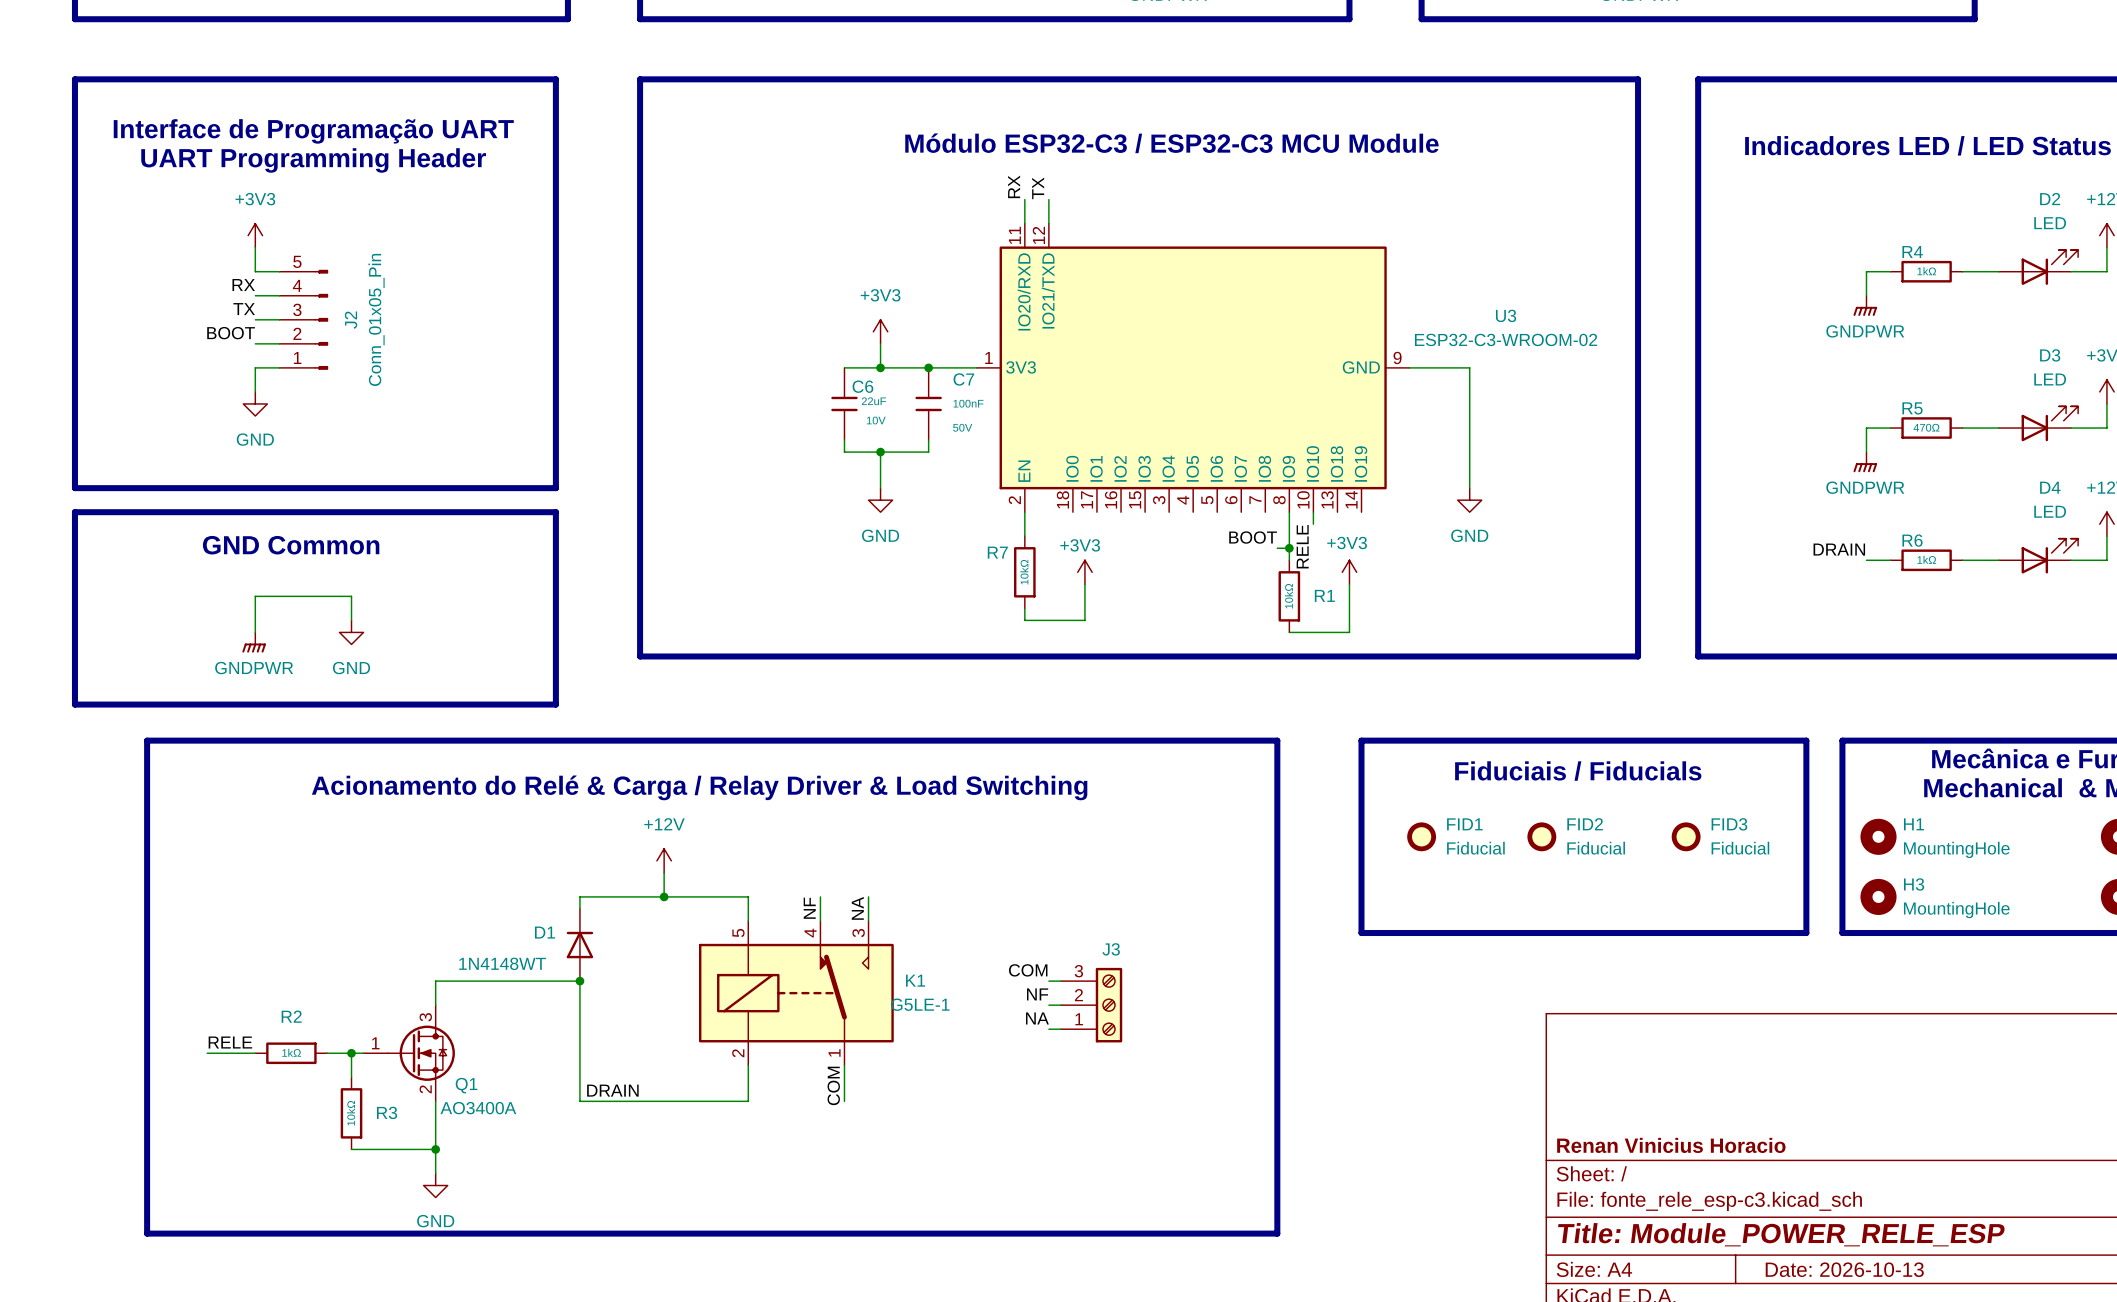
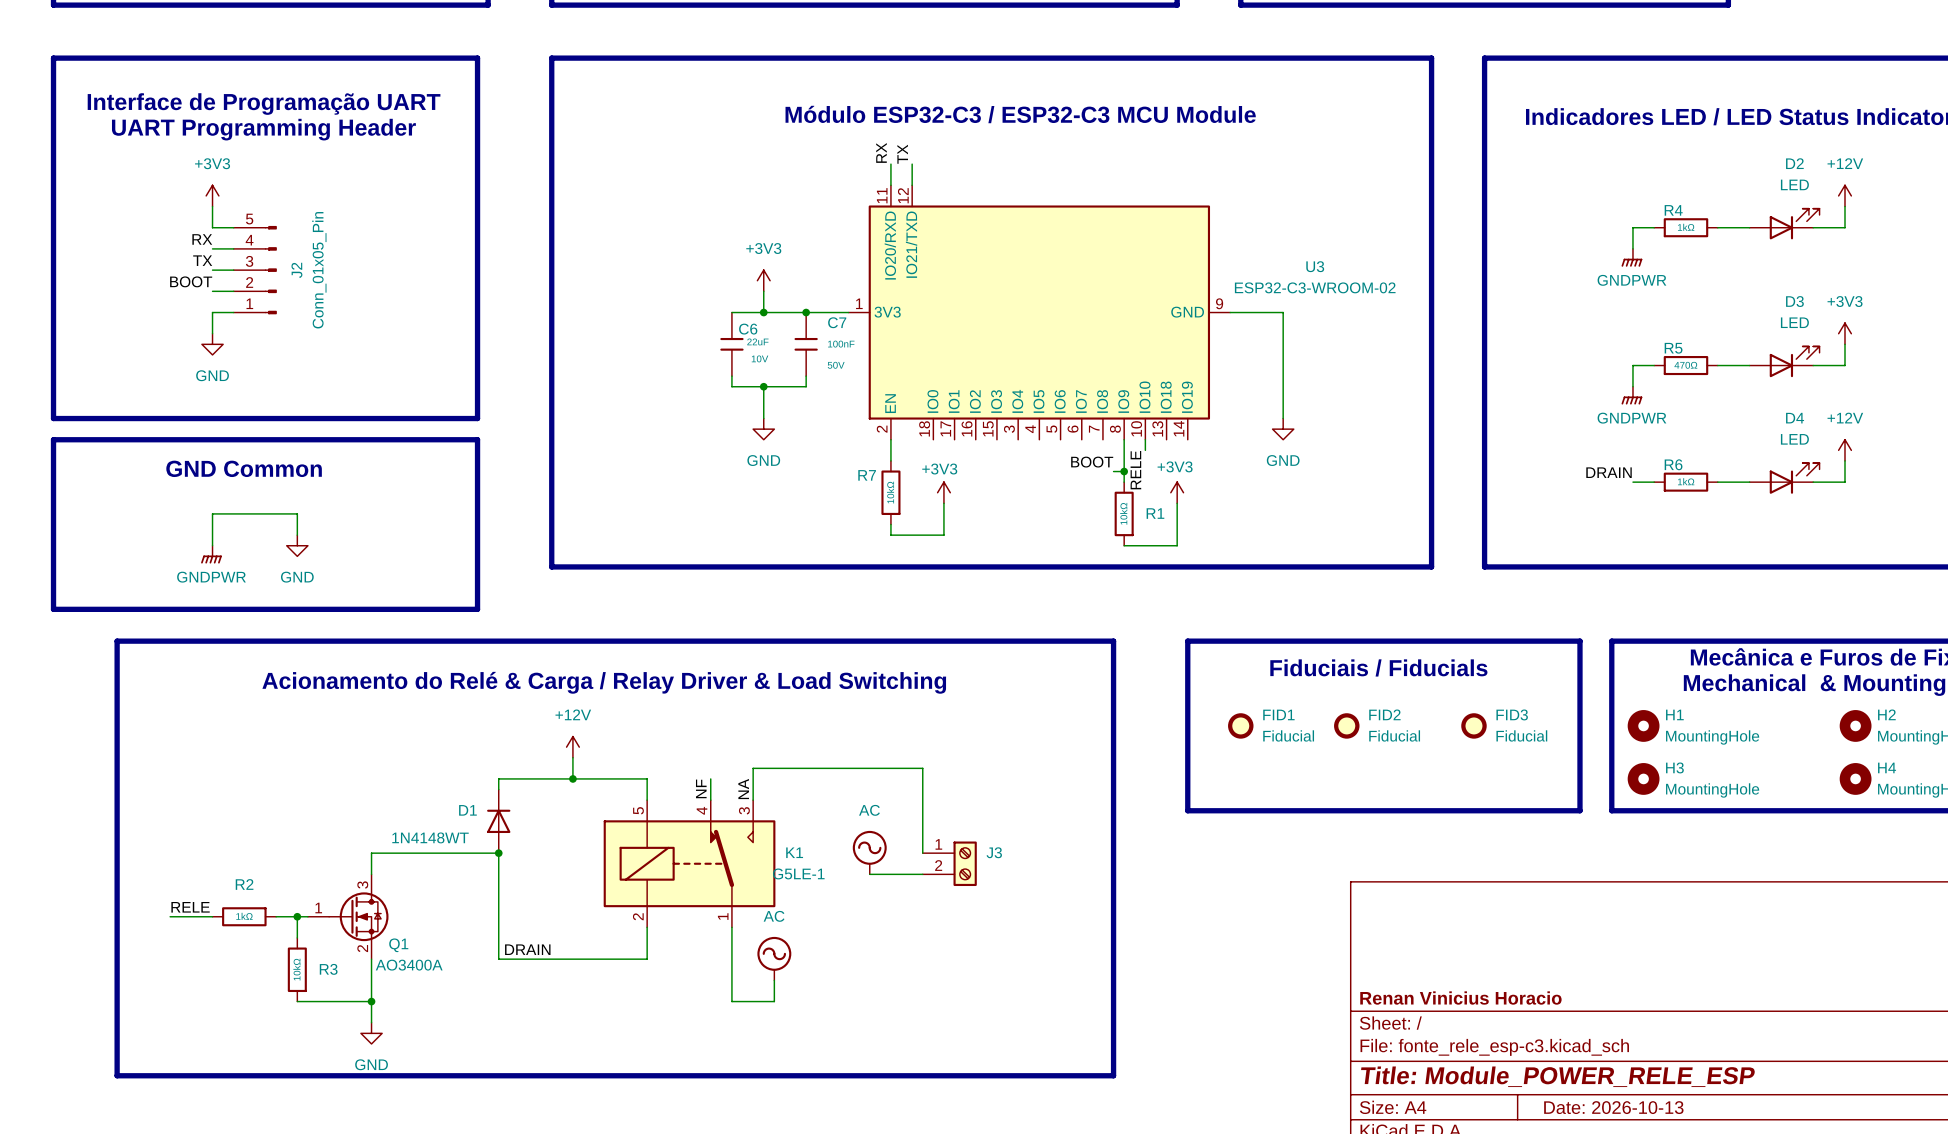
J3 name position: J3 (1111, 949) -> J3 (994, 852)
J3 symbol: [1060, 967, 1123, 1043] -> [922, 841, 977, 887]
label: COM (1028, 970) -> none
power symbol: none -> AC (869, 852)
wire: (1048, 981) (1060, 981) -> (753, 778) (753, 768) (922, 768) (922, 853)
label: NF (1037, 994) -> none
wire: none -> (869, 874) (912, 874)
label: NA (1037, 1018) -> none
wire: (1048, 1029) (1060, 1029) -> none
label: COM (833, 1085) -> none
power symbol: none -> AC (774, 958)
wire: none -> (731, 959) (731, 1001) (774, 1001) (774, 980)

